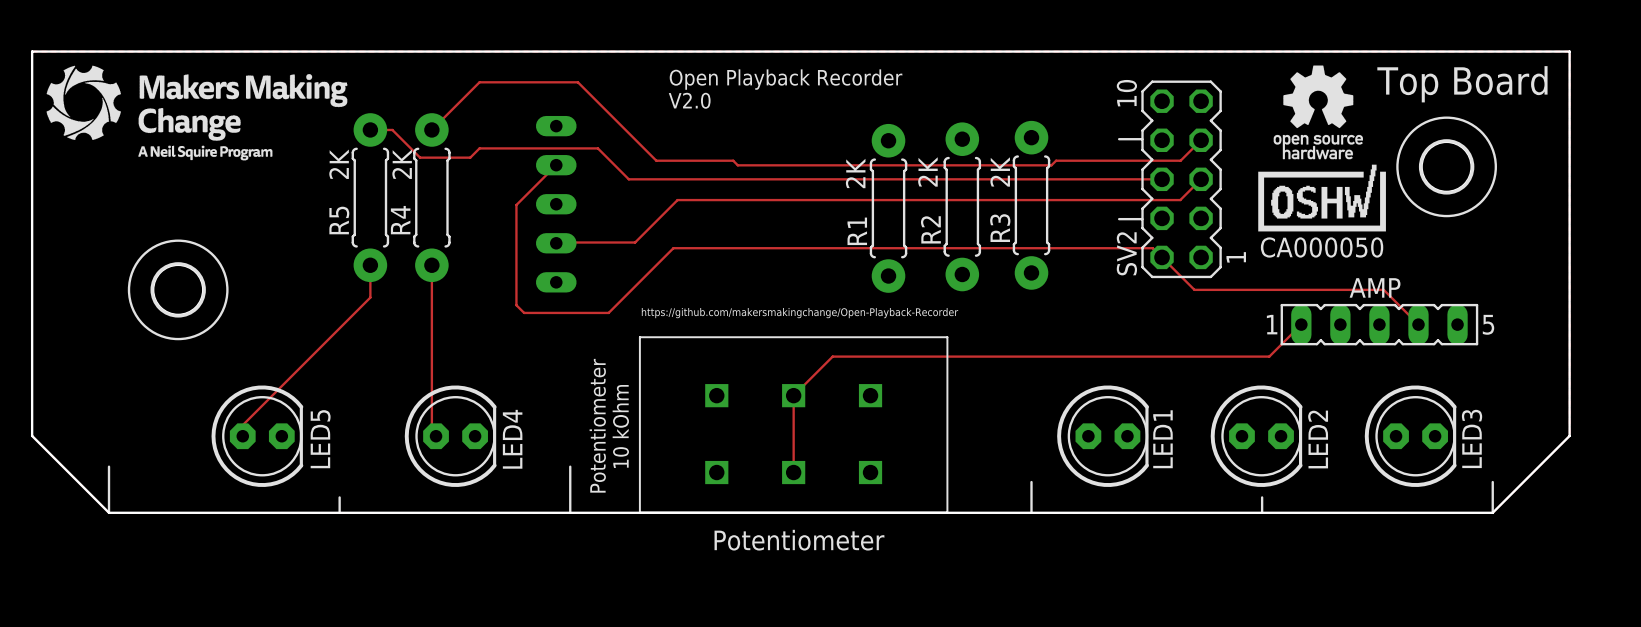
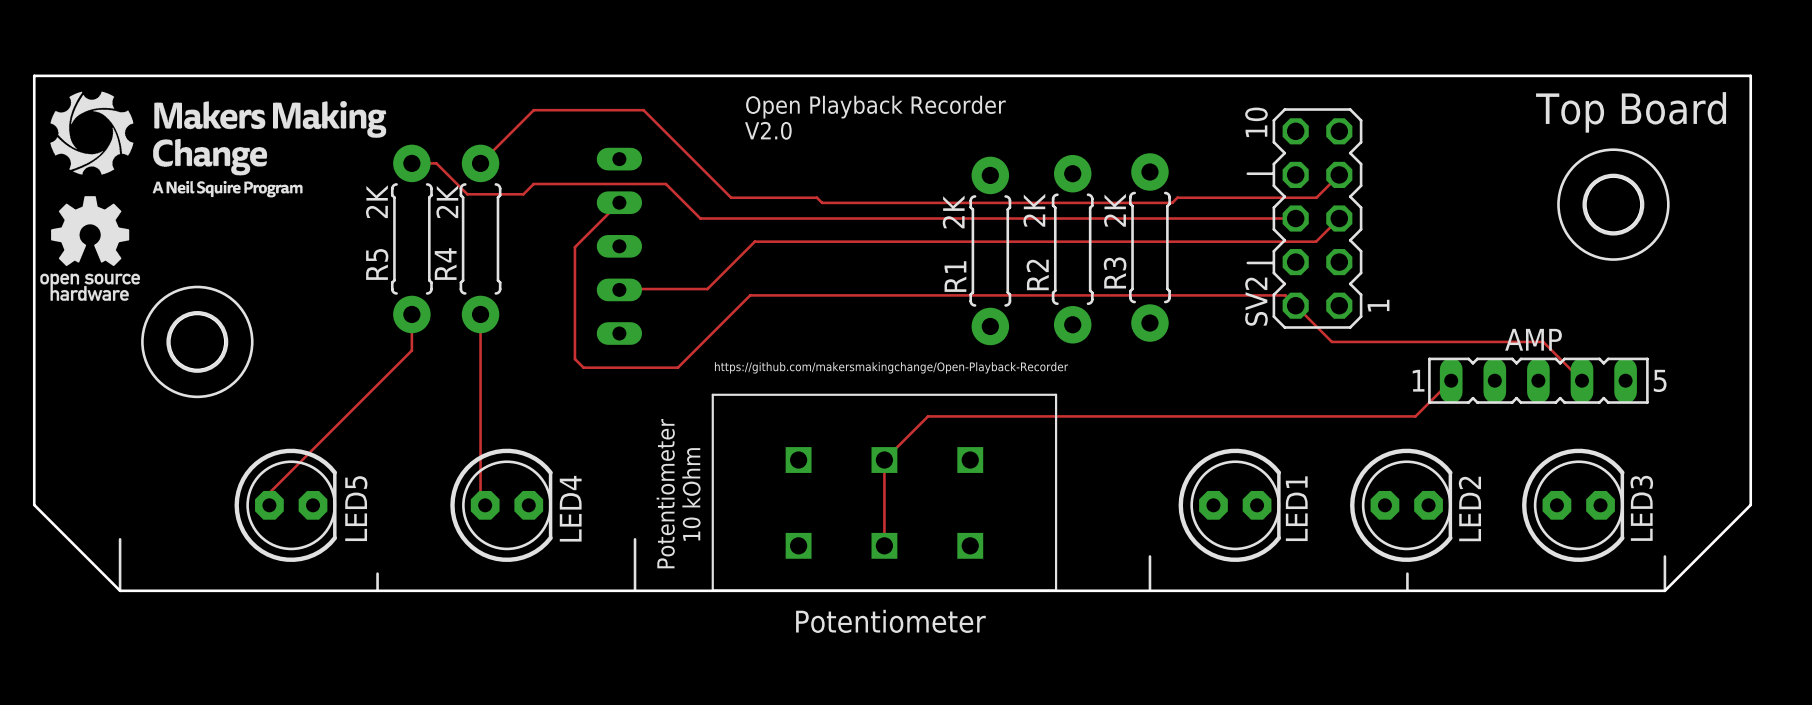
drawing: [1258, 65, 1386, 232] -> none
drawing: none -> [40, 196, 140, 301]

